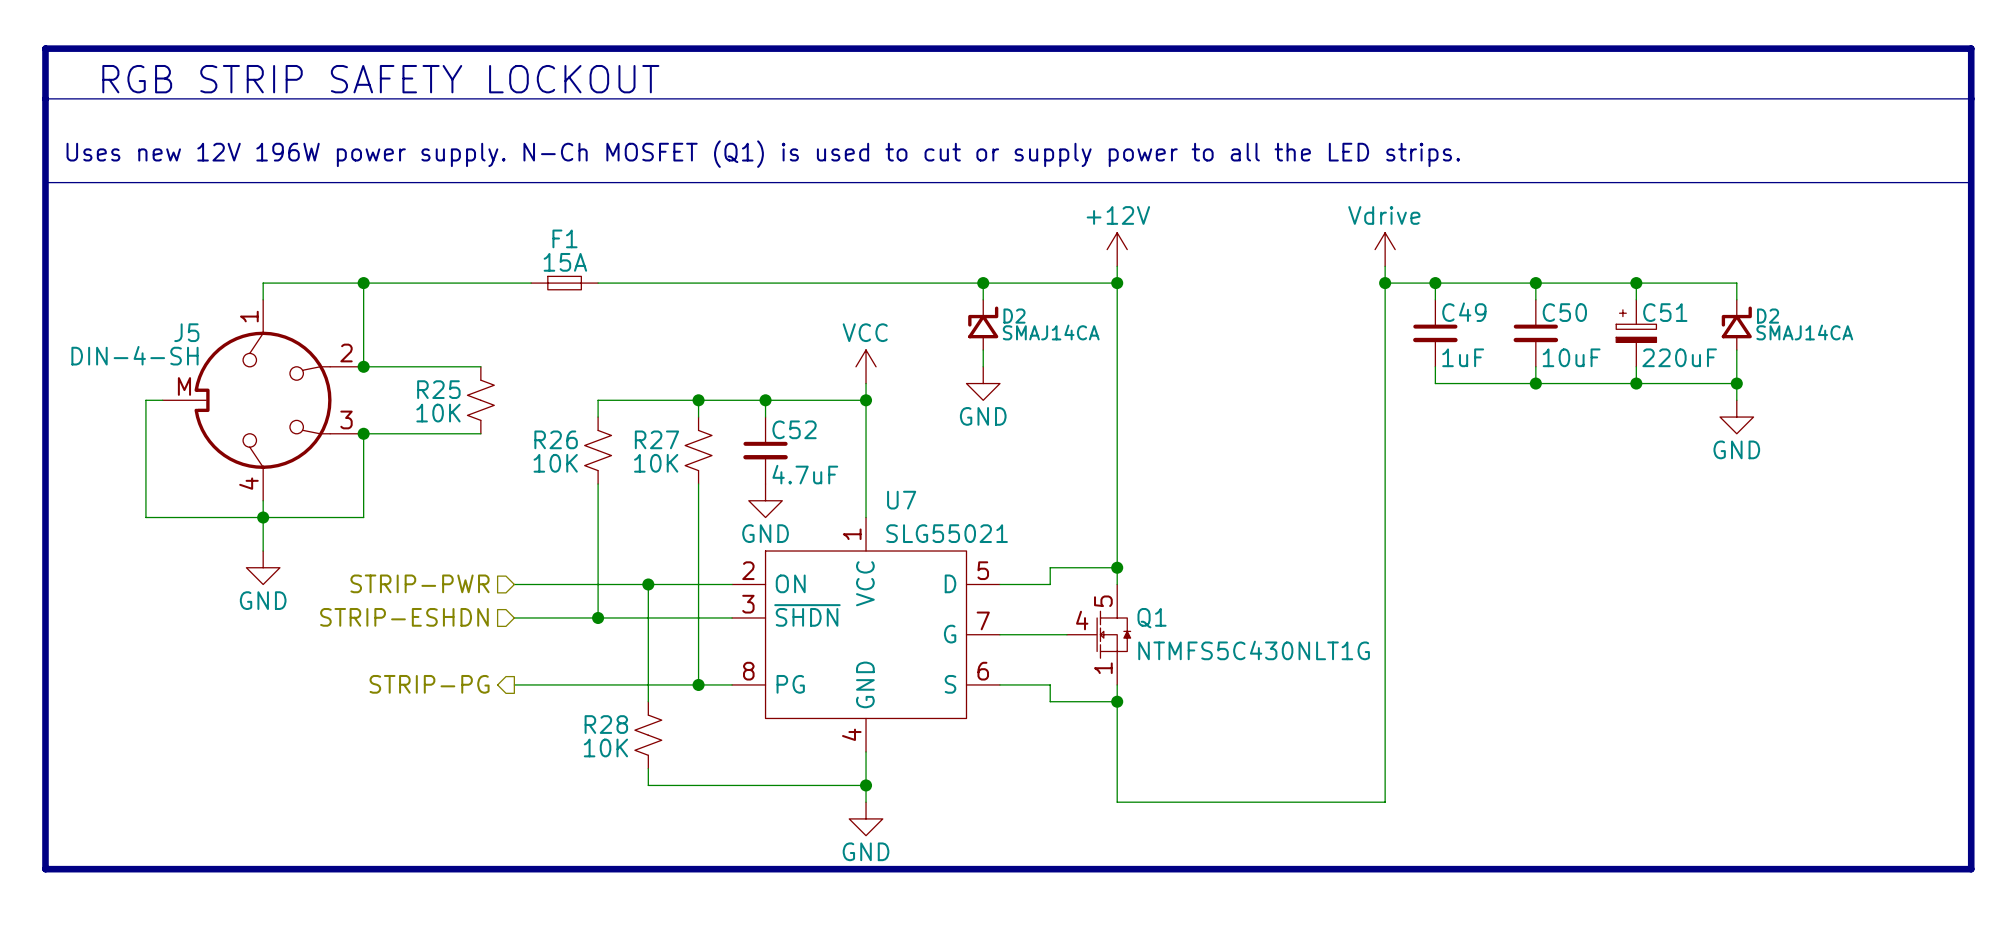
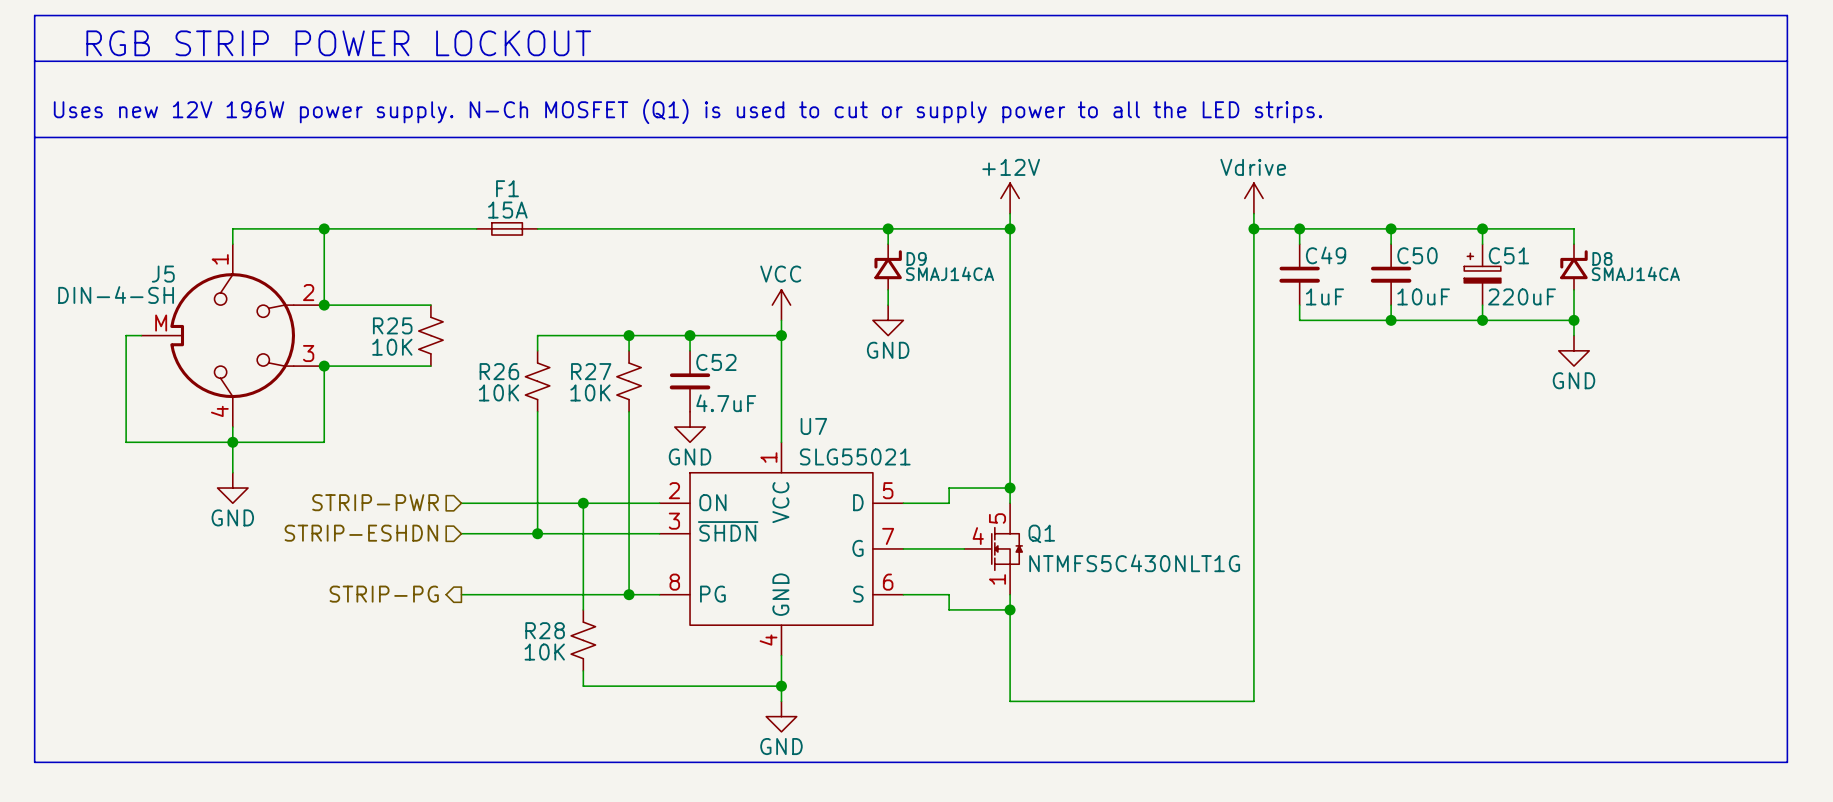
line width: thick (45, 48) (45, 869) (1971, 869) (1971, 48) (45, 48) -> thin (34, 15) (34, 762) (1787, 762) (1787, 15) (34, 15)
text: RGB STRIP SAFETY LOCKOUT (380, 79) -> RGB STRIP POWER LOCKOUT (338, 43)
D2 name: D2 (1014, 316) -> D9 (916, 258)
D2 name: D2 (1768, 316) -> D8 (1602, 258)

